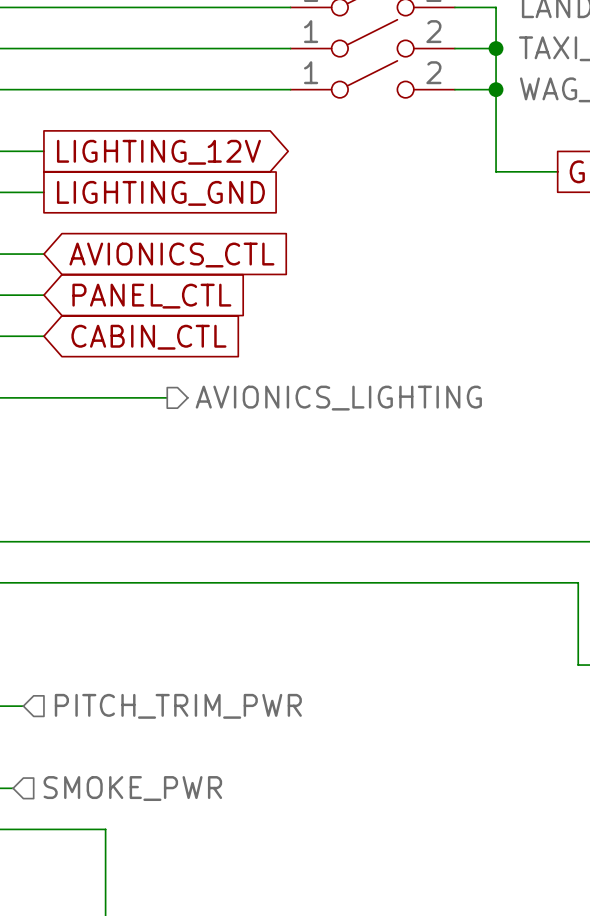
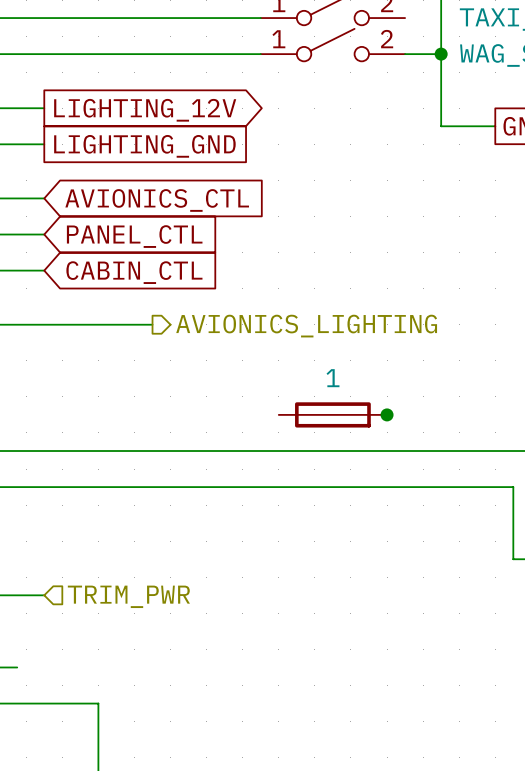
wire: (454, 48) (496, 48) -> none
junction: (496, 48) -> none
part: none -> 1 (332, 414)
junction: none -> (387, 414)
wire: none -> (26, 595) (44, 595)
hierarchical label: PITCH_TRIM_PWR (178, 706) -> TRIM_PWR (128, 596)
hierarchical label: SMOKE_PWR (132, 788) -> none

